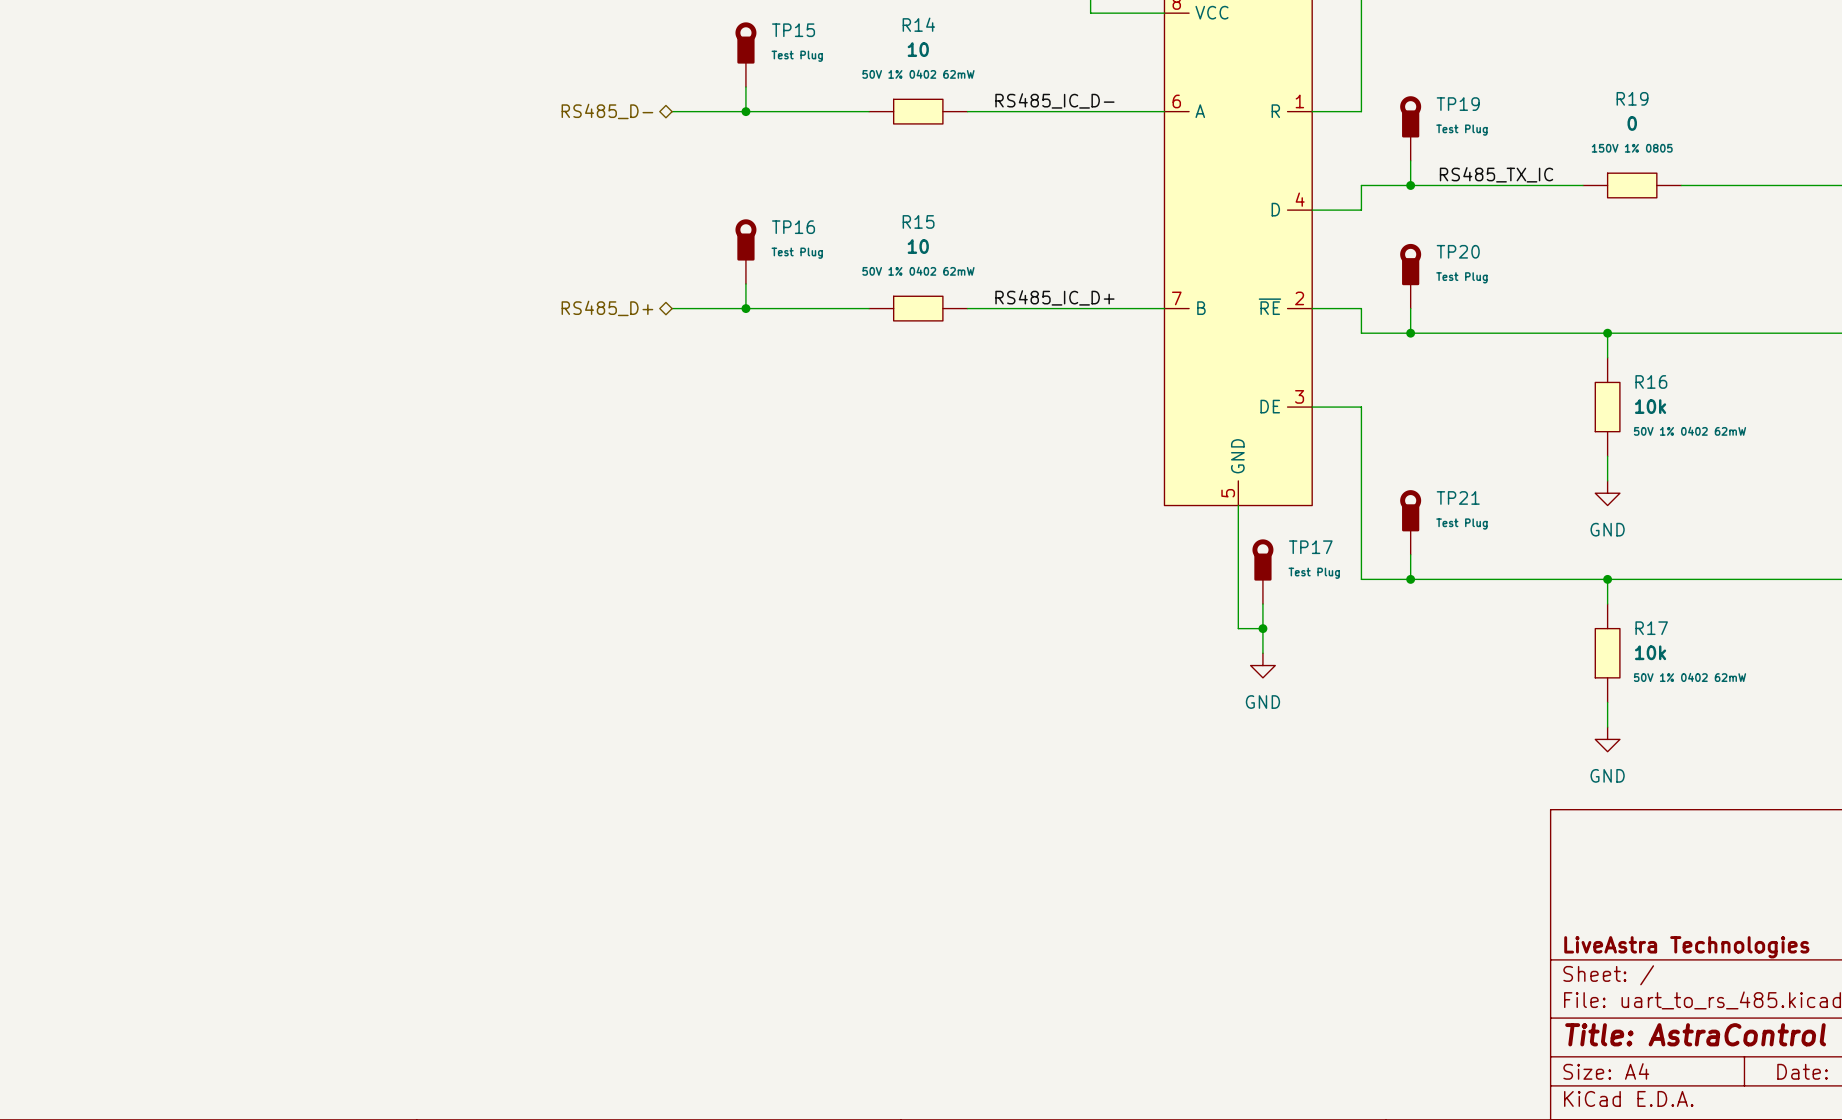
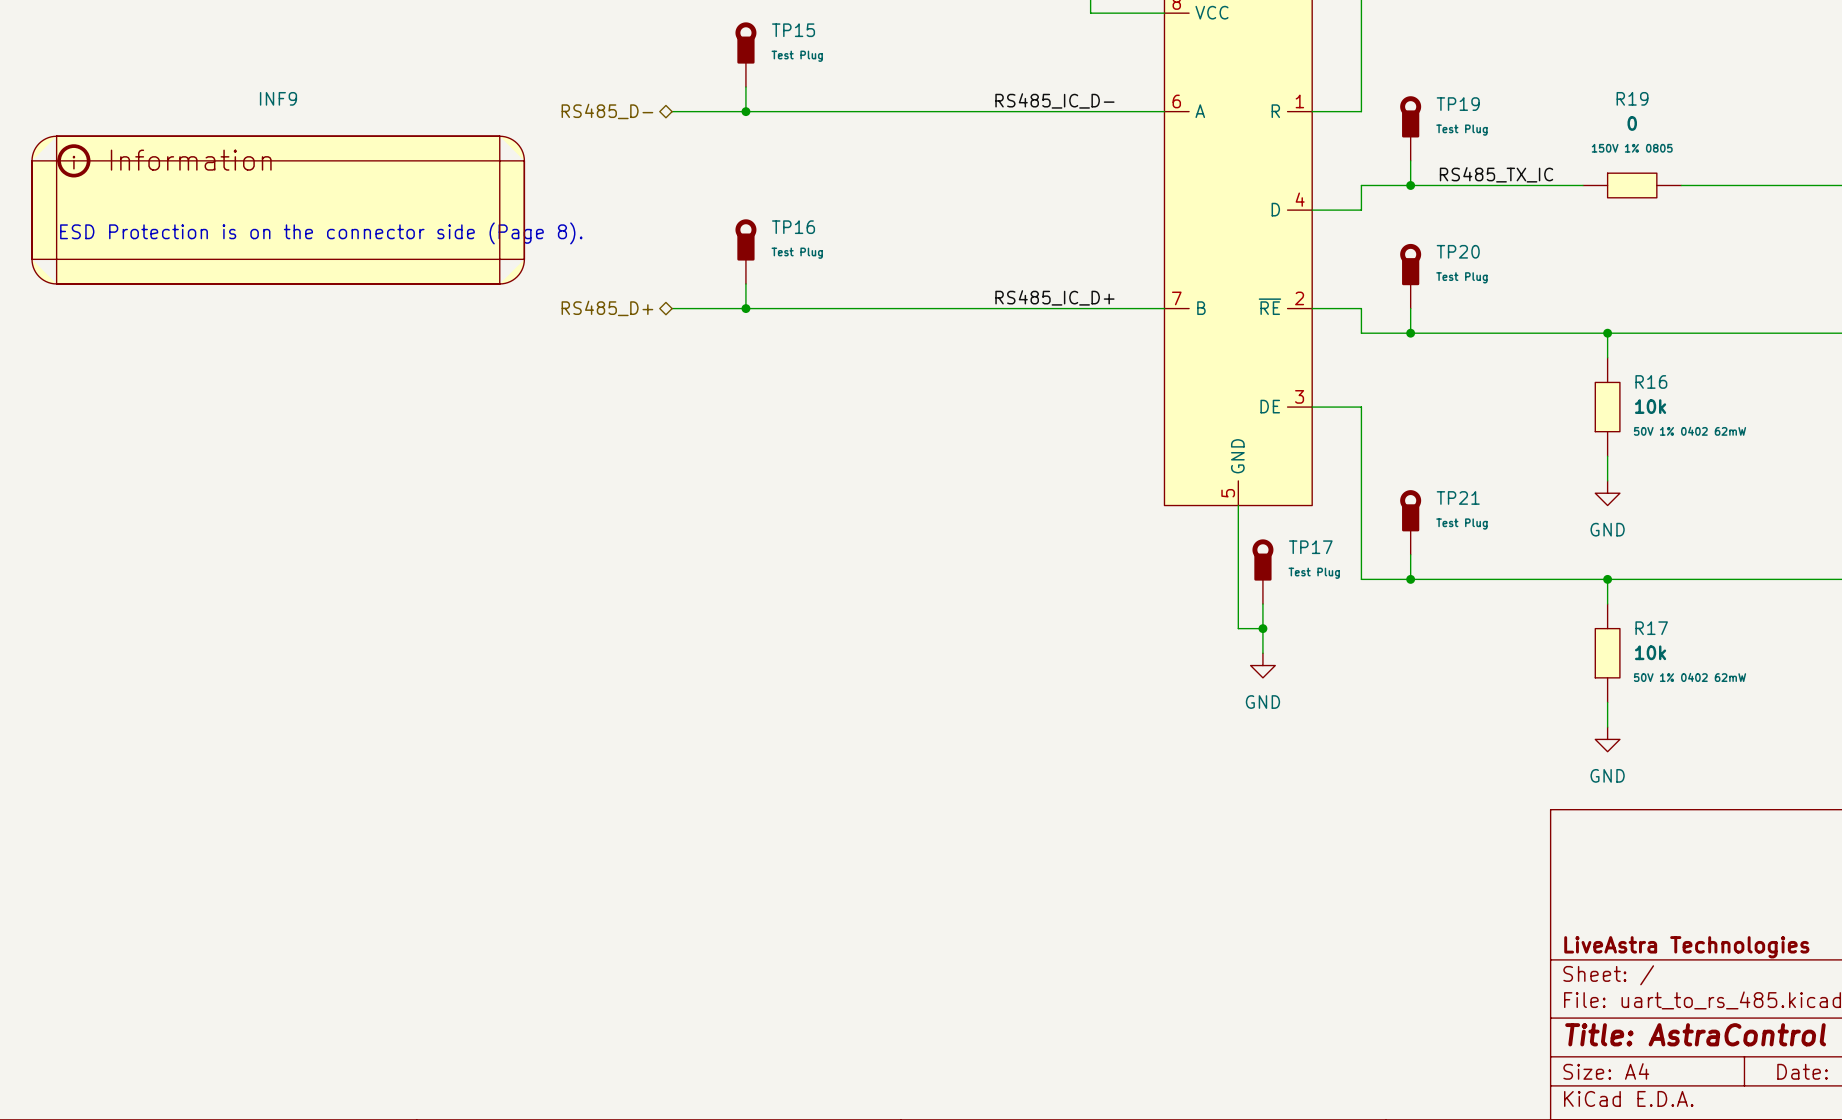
R14: 10 (918, 111) -> none
INF9: none -> (278, 210)
text: none -> ESD Protection is on the connector side (Page 8). (321, 233)
R15: 10 (918, 308) -> none

